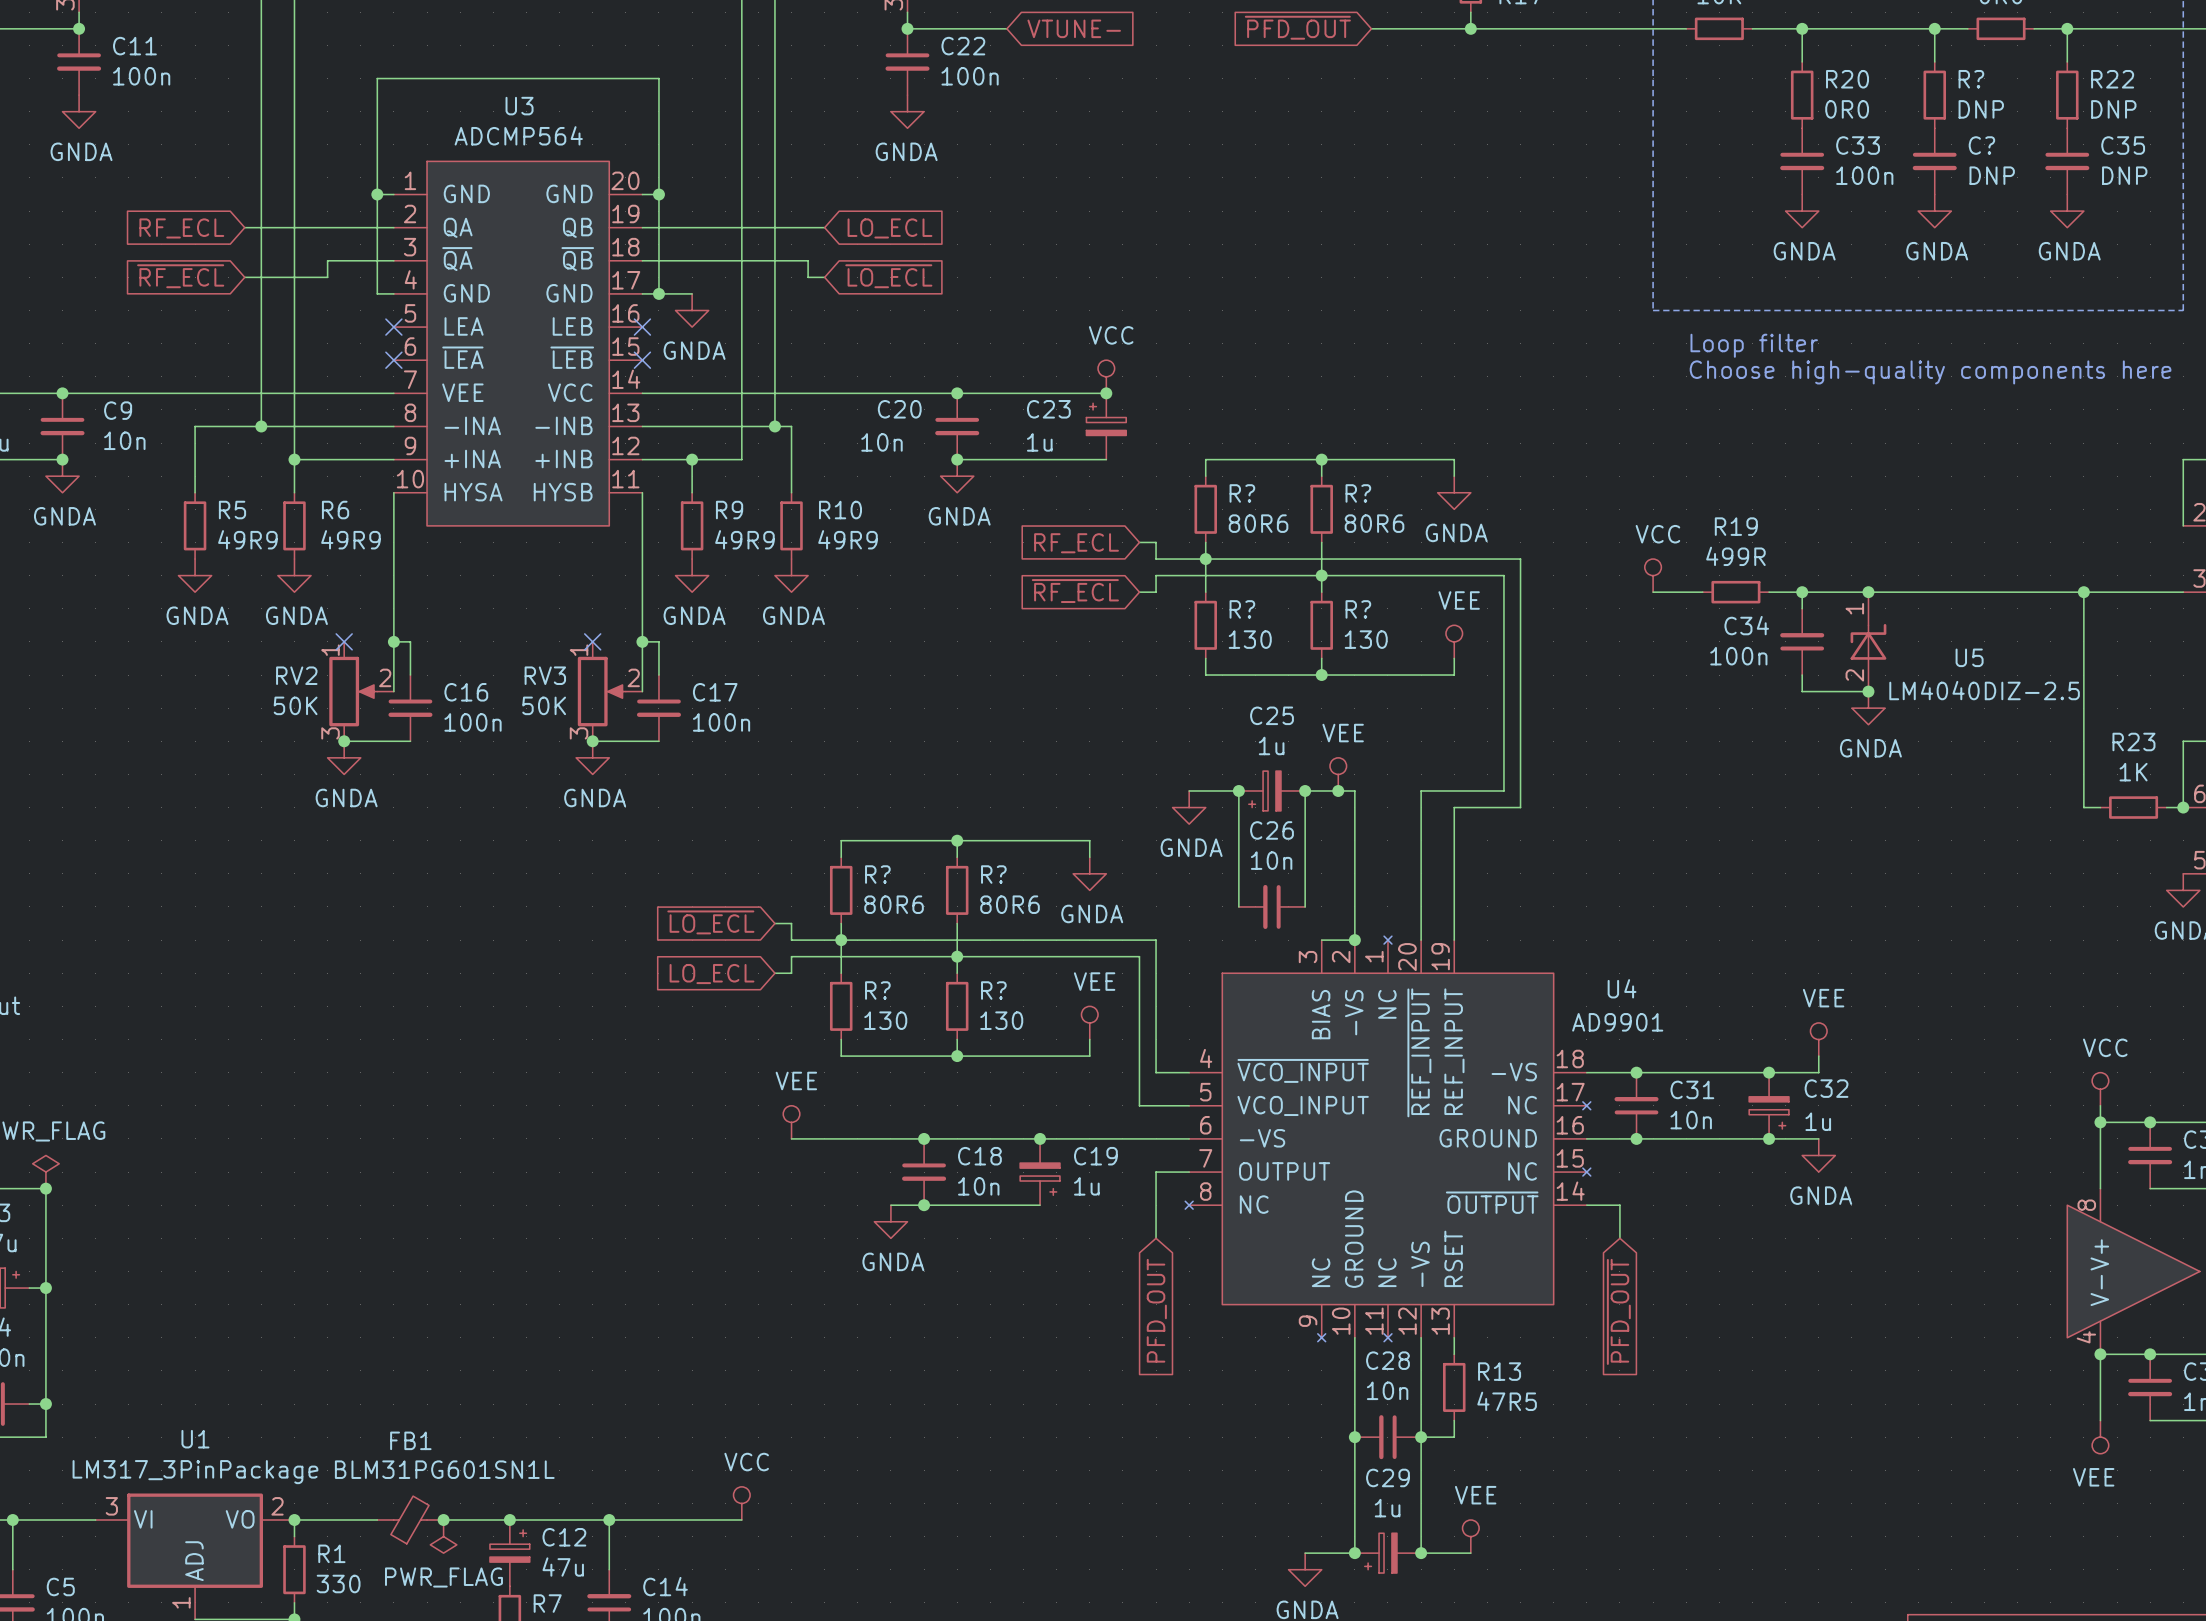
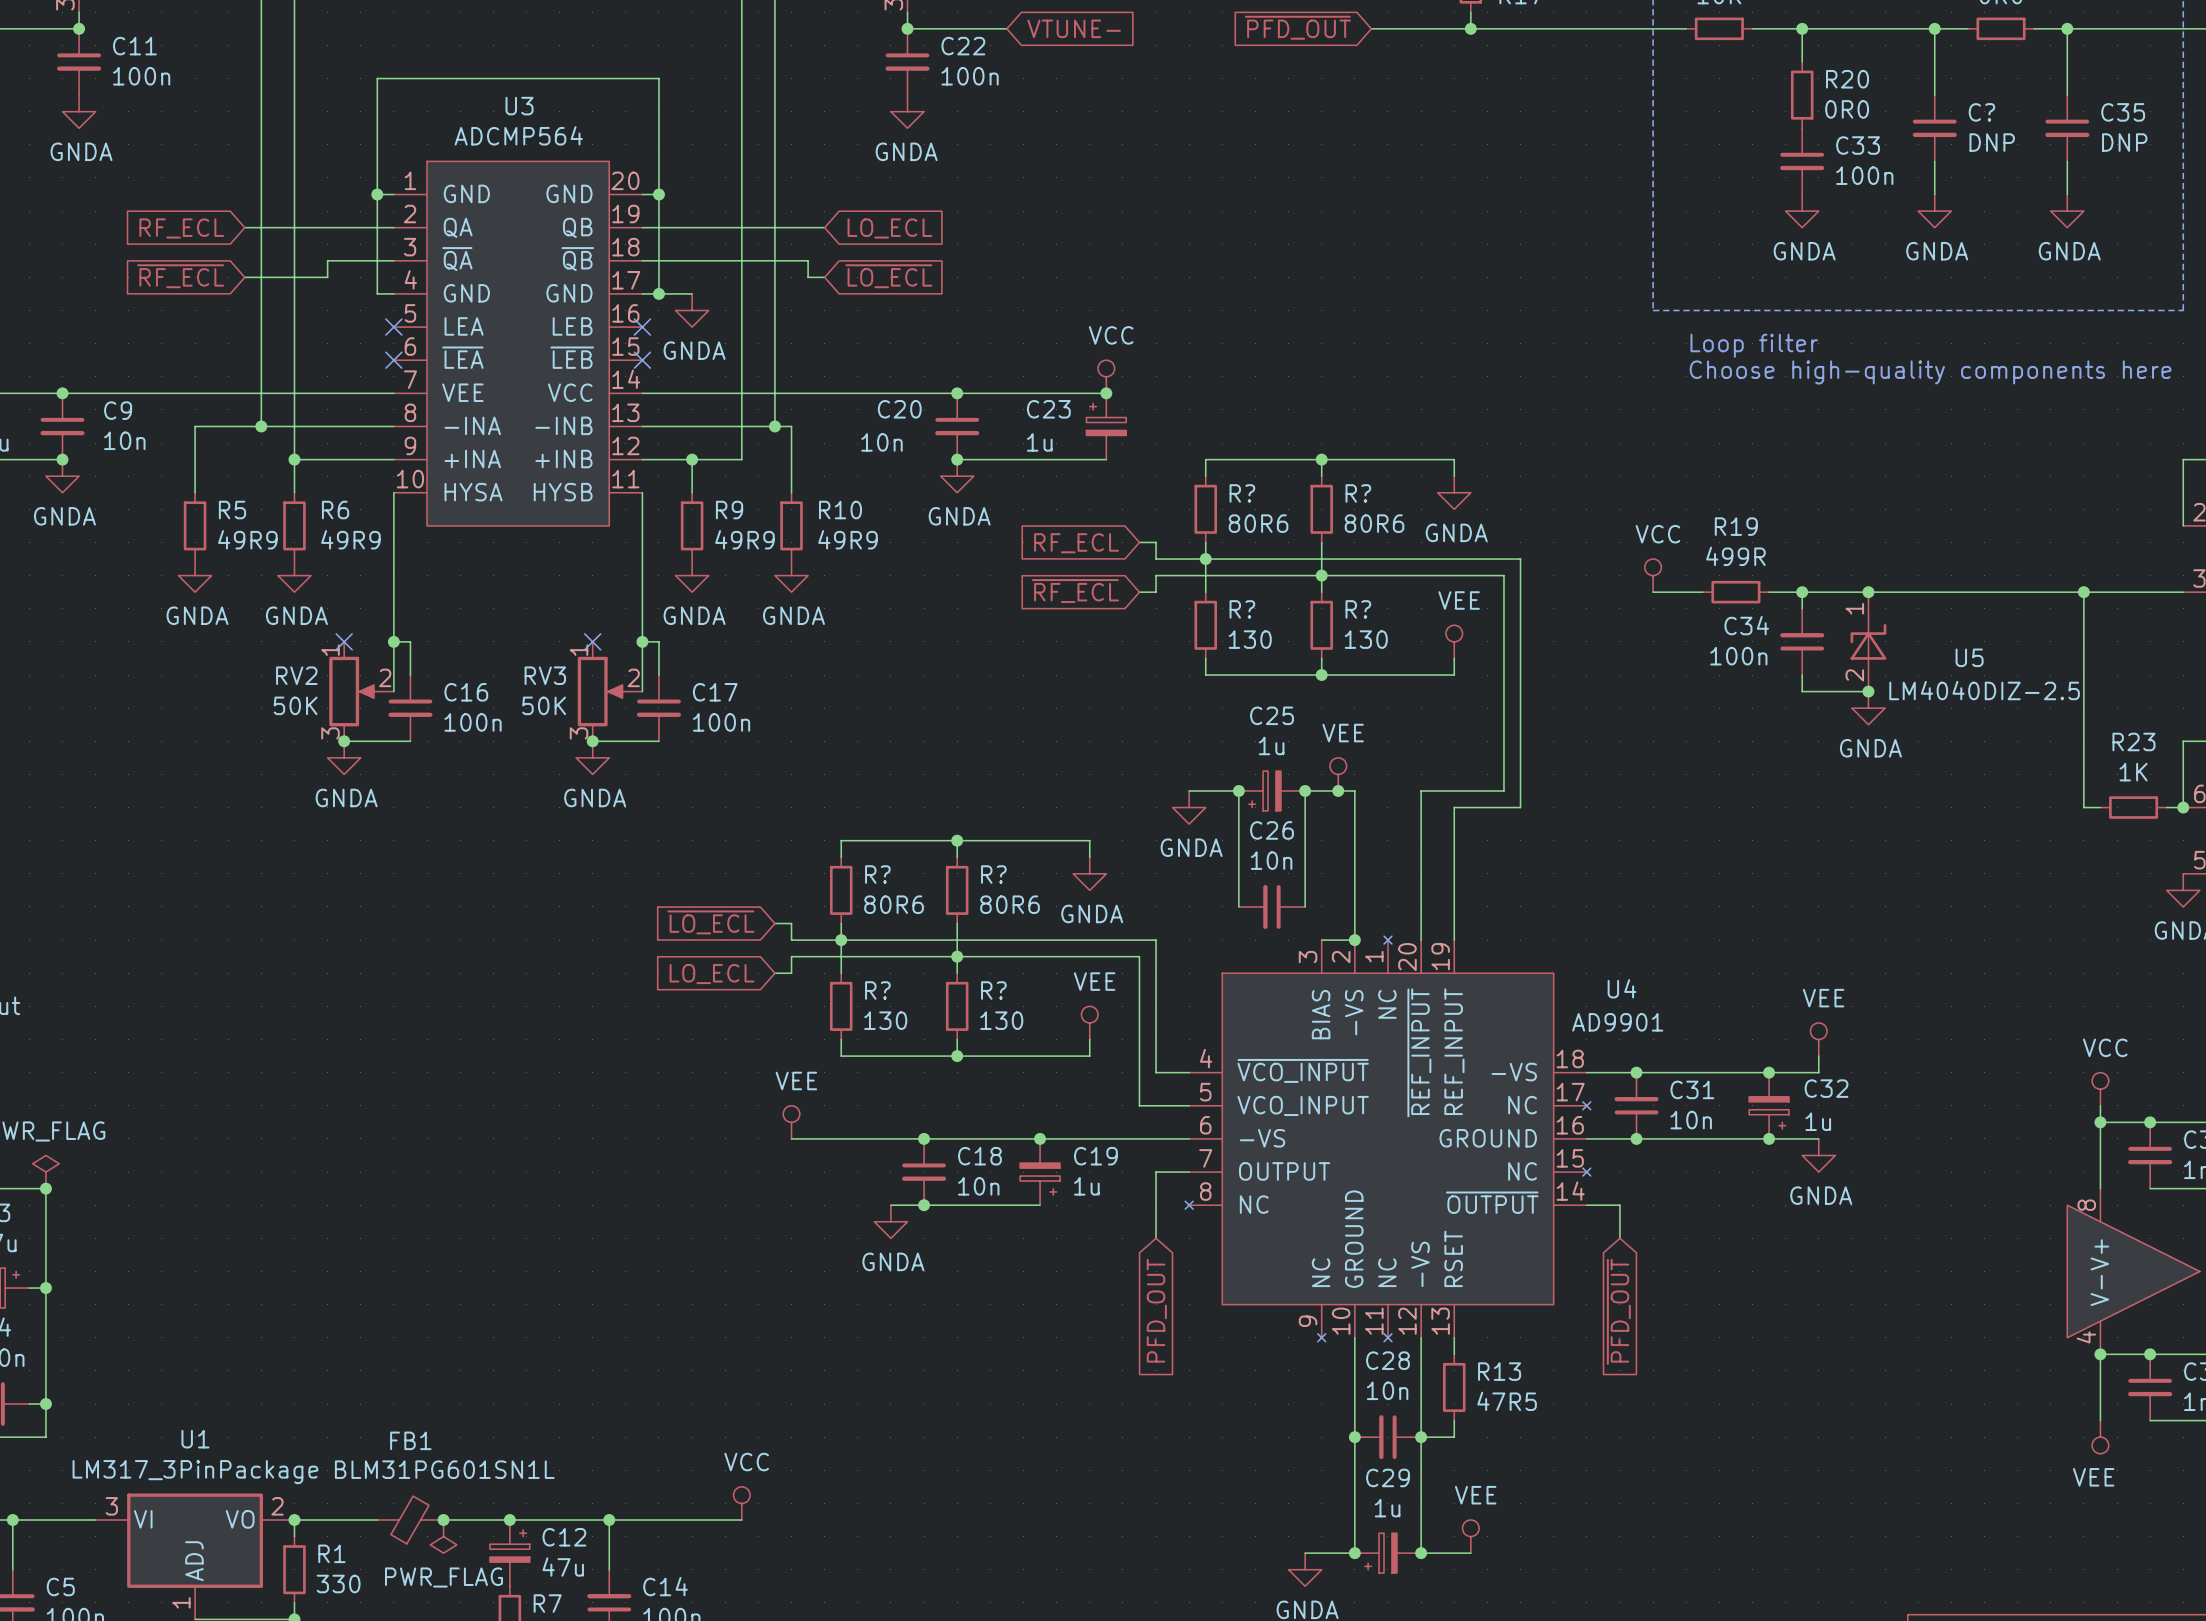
wire: none -> (1934, 61) (1934, 95)
wire: none -> (2067, 61) (2067, 95)
R?: DNP (1934, 95) -> none
R22: DNP (2067, 95) -> none
C? position: (1934, 161) -> (1934, 128)
C35 position: (2067, 161) -> (2067, 128)

